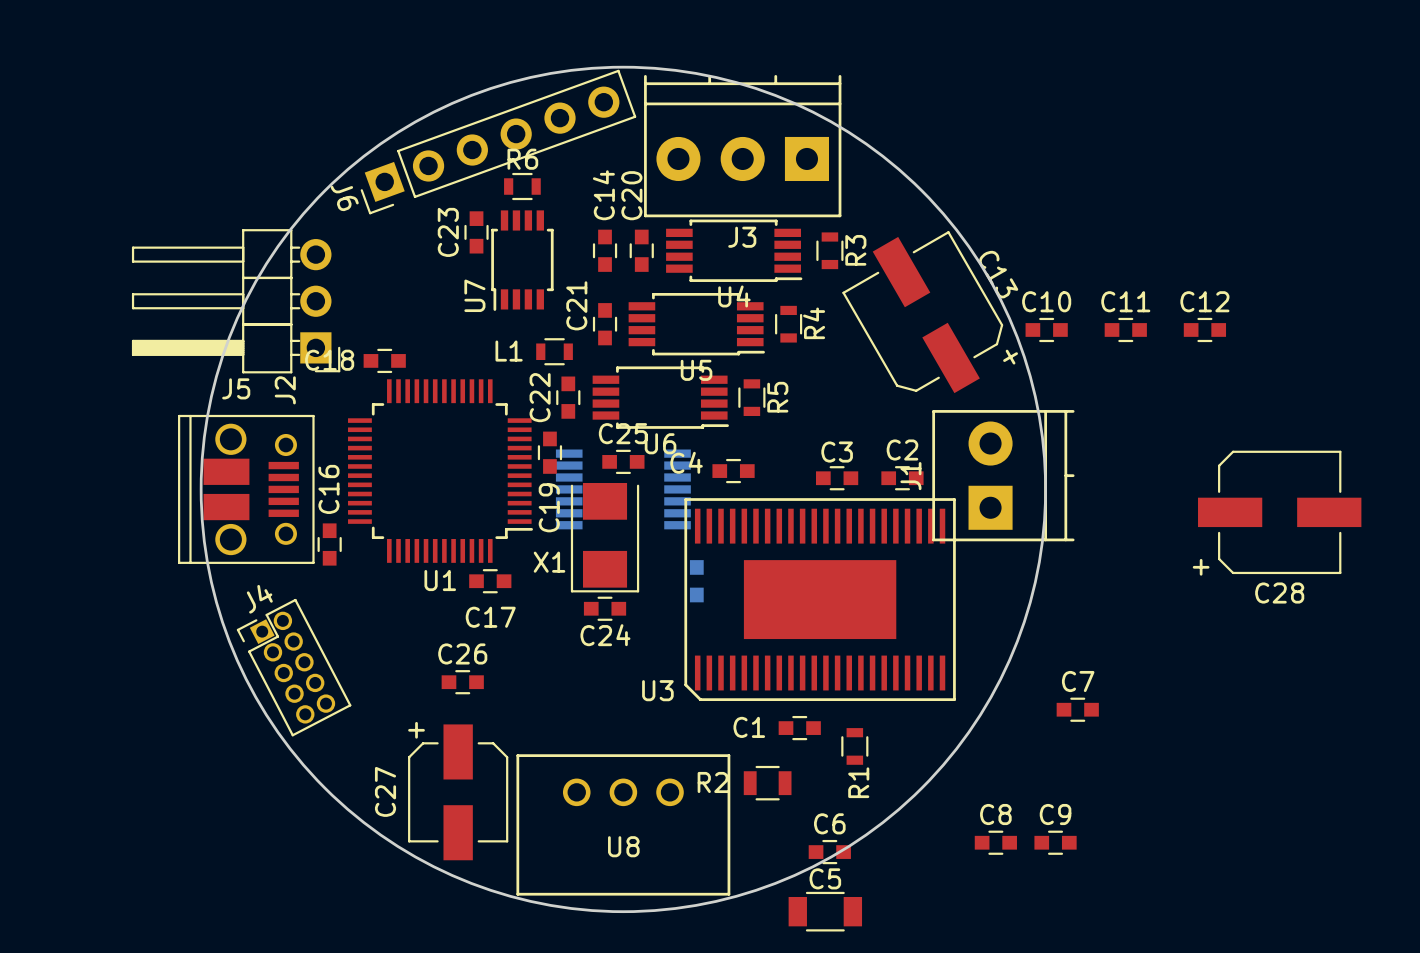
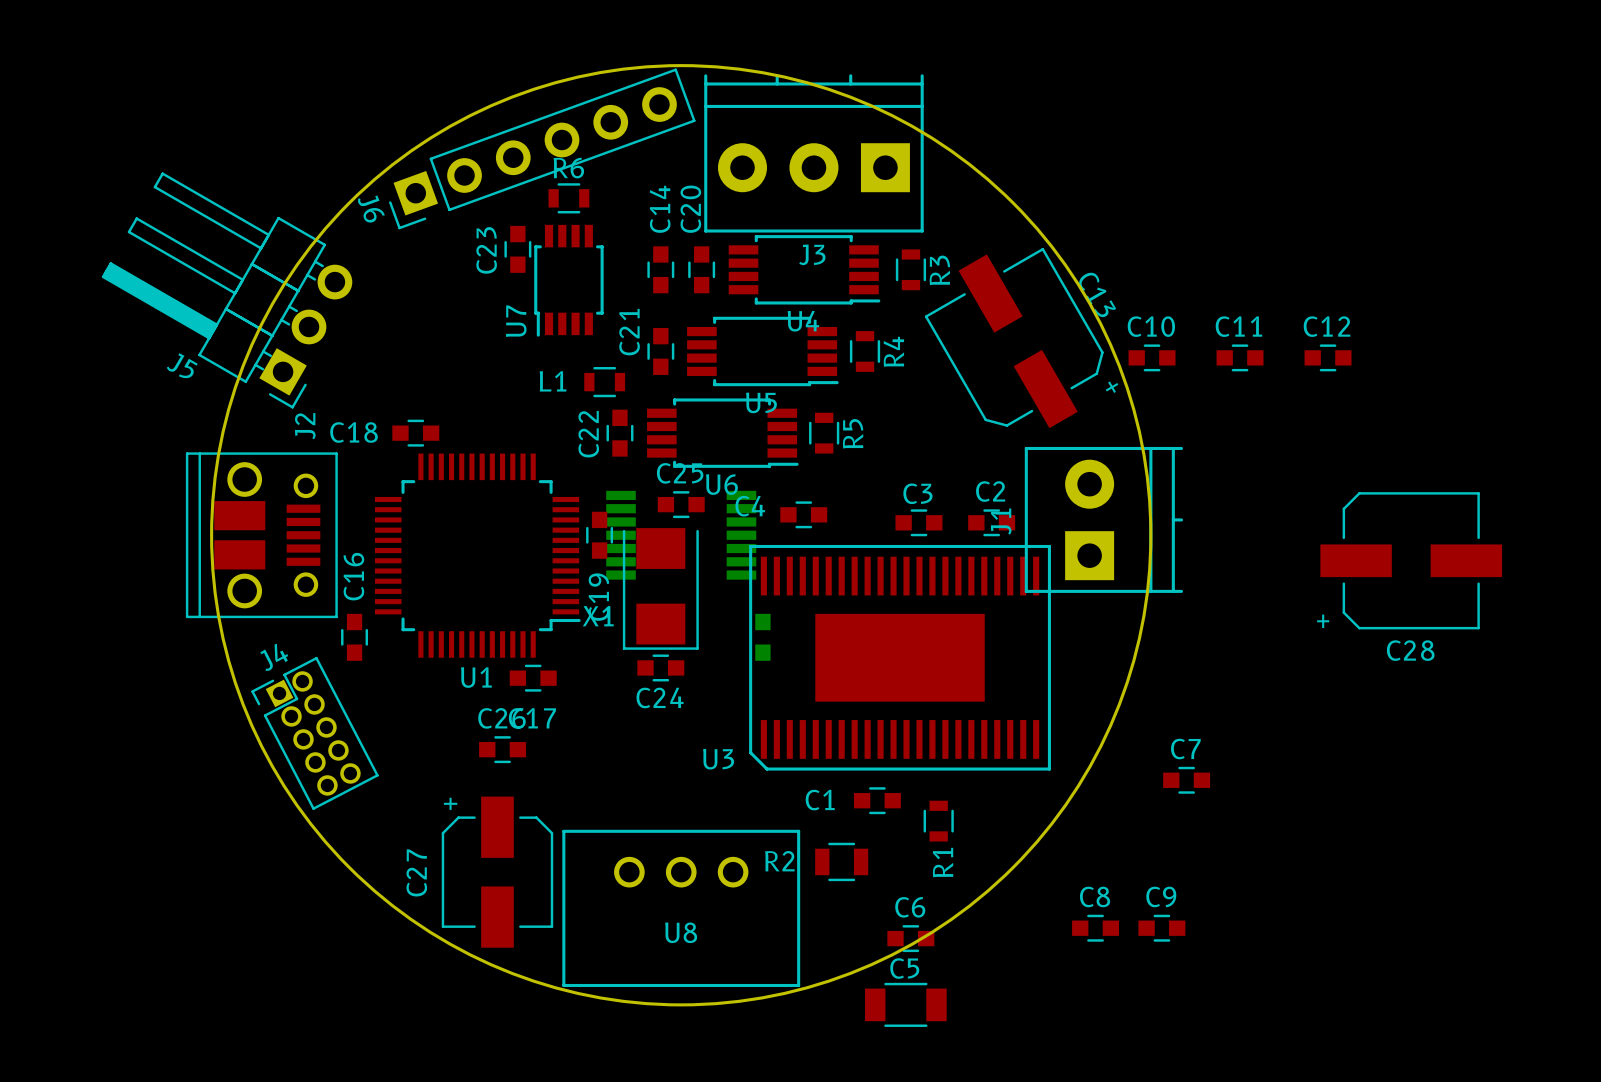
J5 rotation: 0° (236, 301) -> 30° clockwise (227, 290)
C18 position: (384, 360) -> (415, 433)
C19 position: (549, 452) -> (599, 535)
U1 position: (440, 471) -> (477, 555)
C16 position: (329, 544) -> (354, 637)
C17 position: (490, 581) -> (533, 678)

